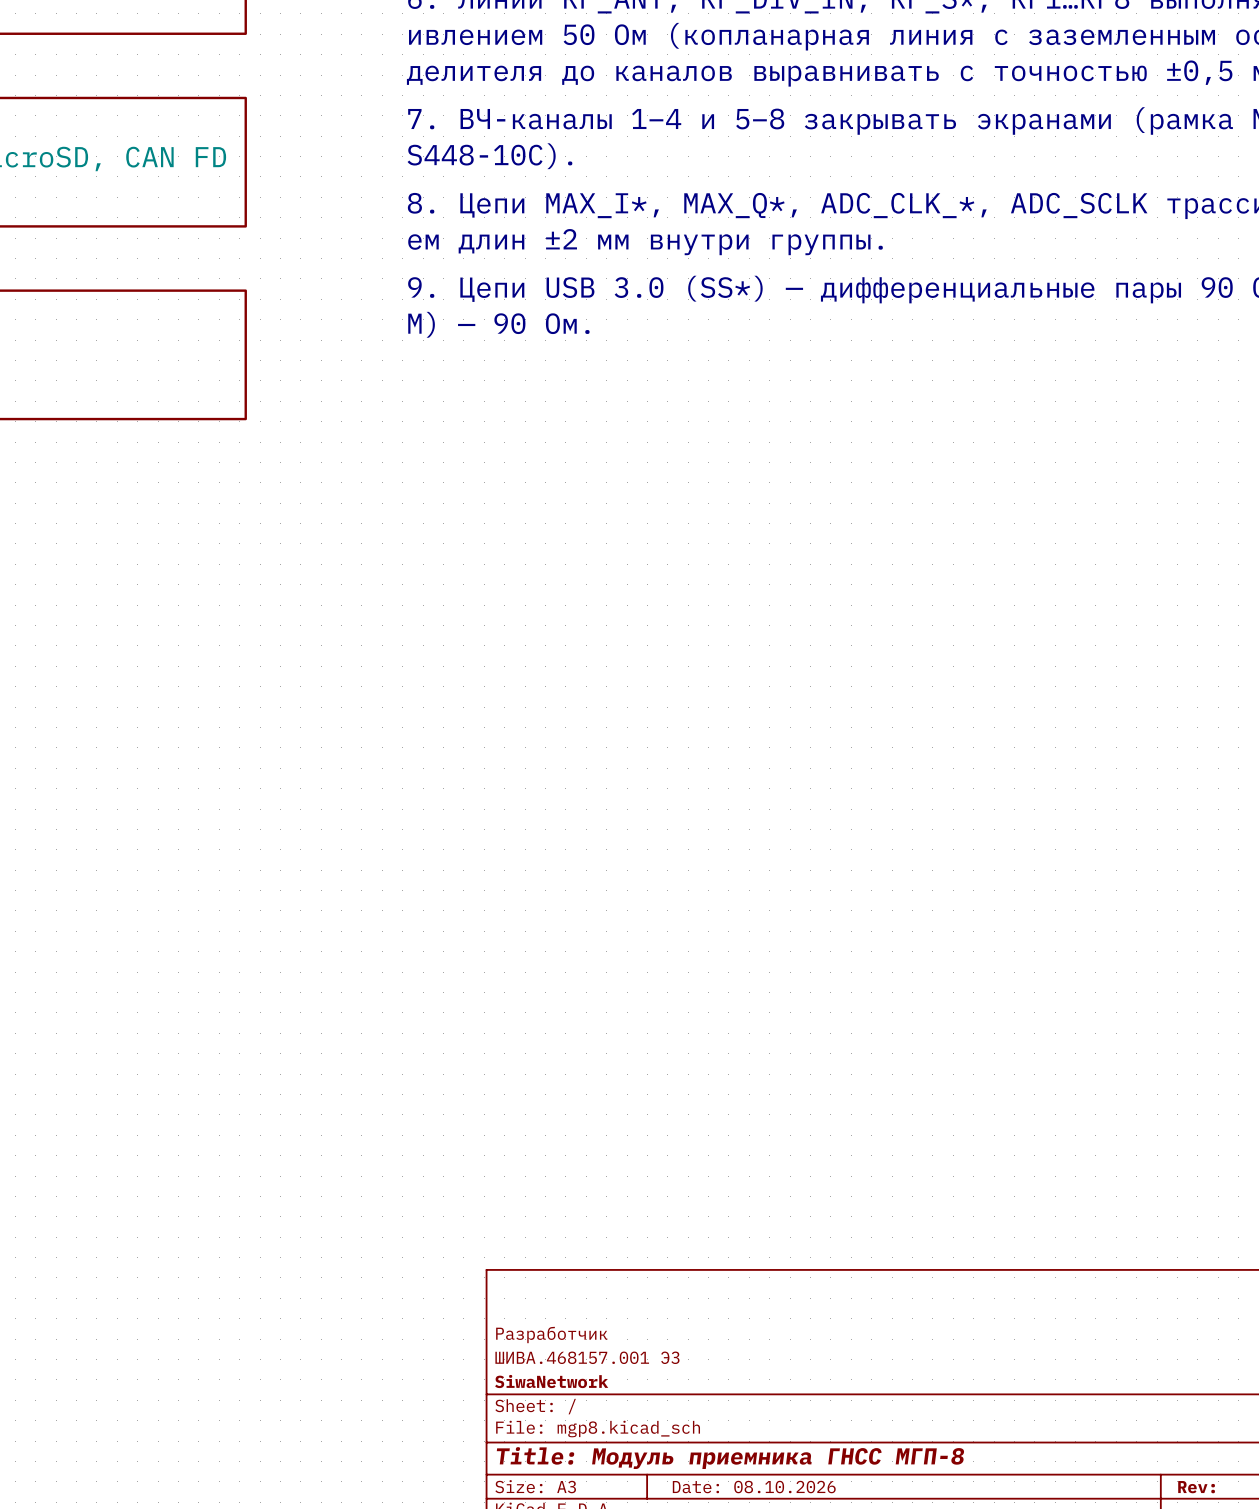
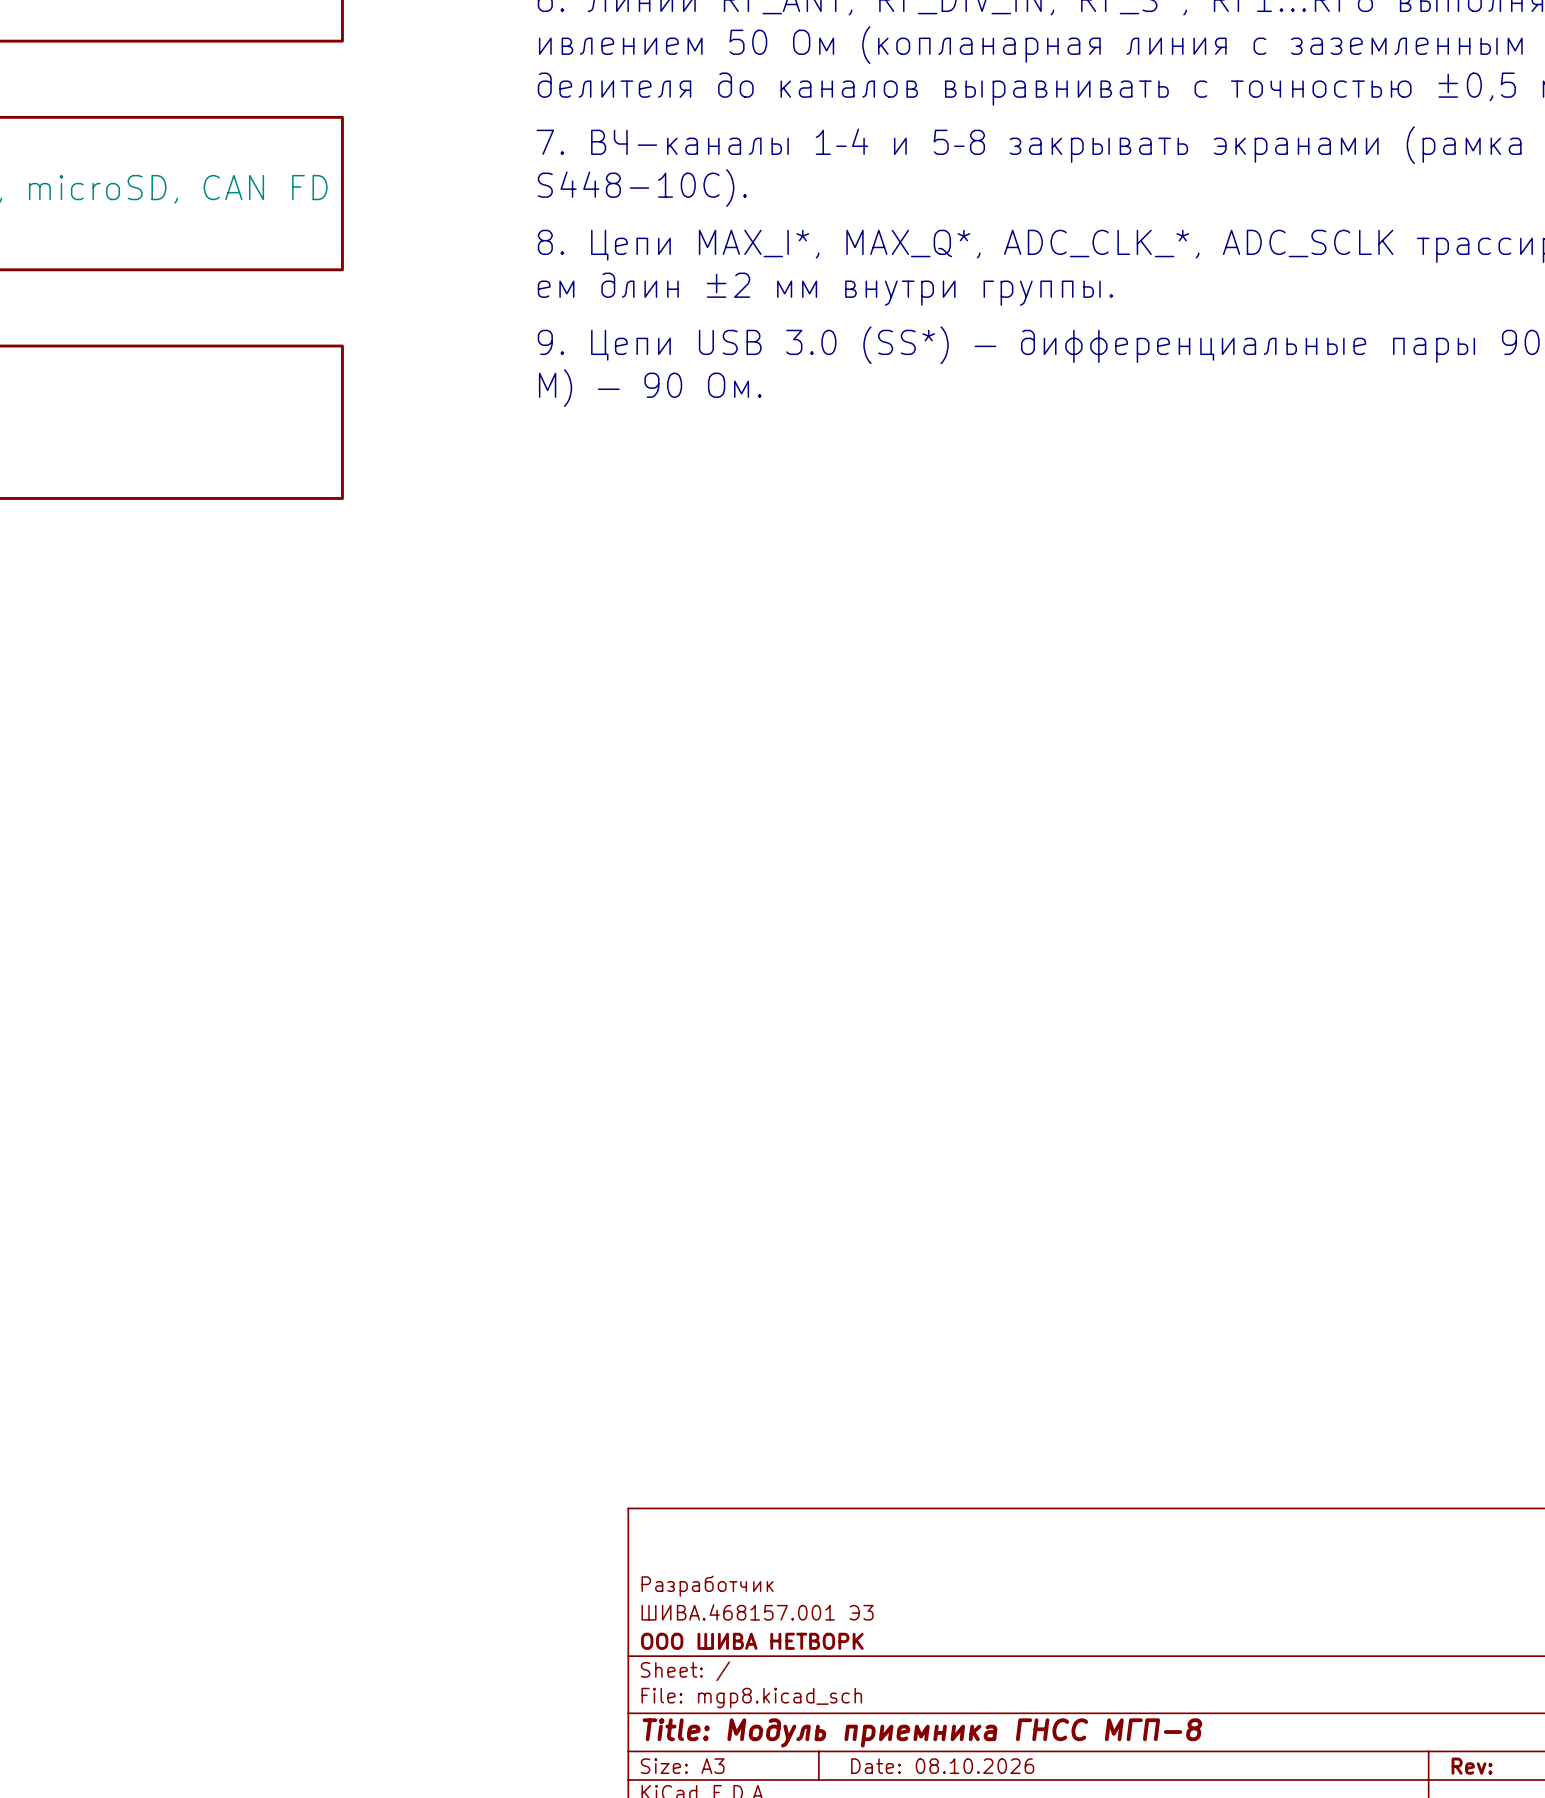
title block: SiwaNetwork (551, 1381) -> ООО ШИВА НЕТВОРК (752, 1641)

